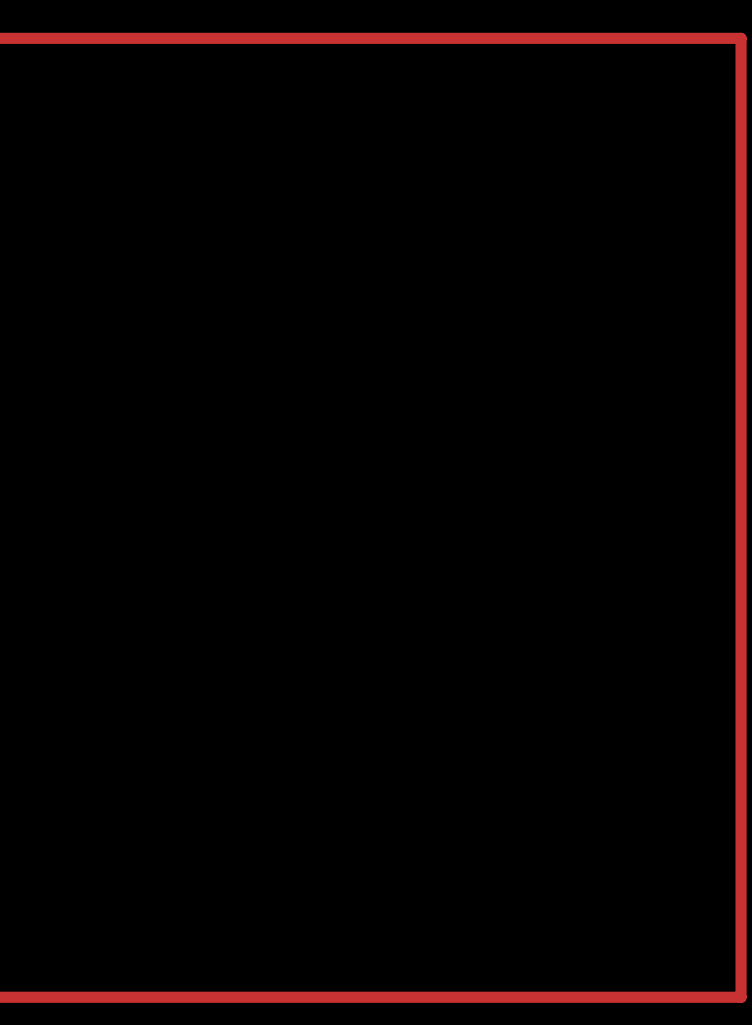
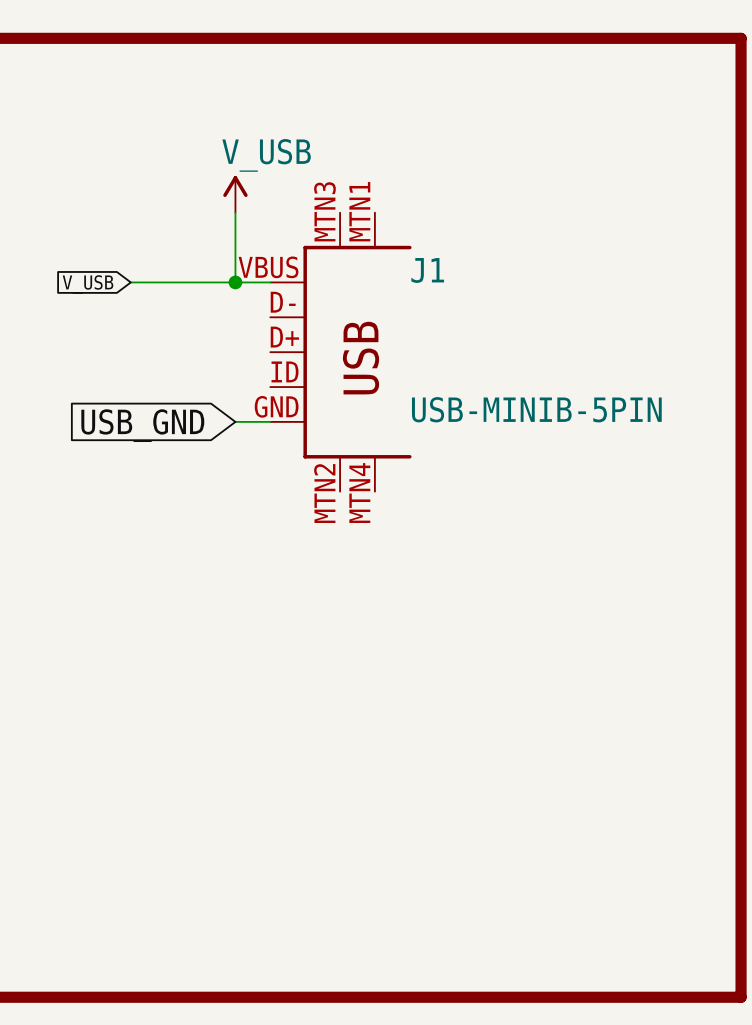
power symbol: none -> V_USB (235, 194)
wire: none -> (235, 212) (235, 282)
wire: none -> (130, 282) (270, 282)
junction: none -> (235, 282)
global label: none -> V_USB (88, 284)
J1: none -> USB-MINIB-5PIN (340, 352)
wire: none -> (235, 421) (270, 421)
global label: none -> USB_GND (142, 425)

